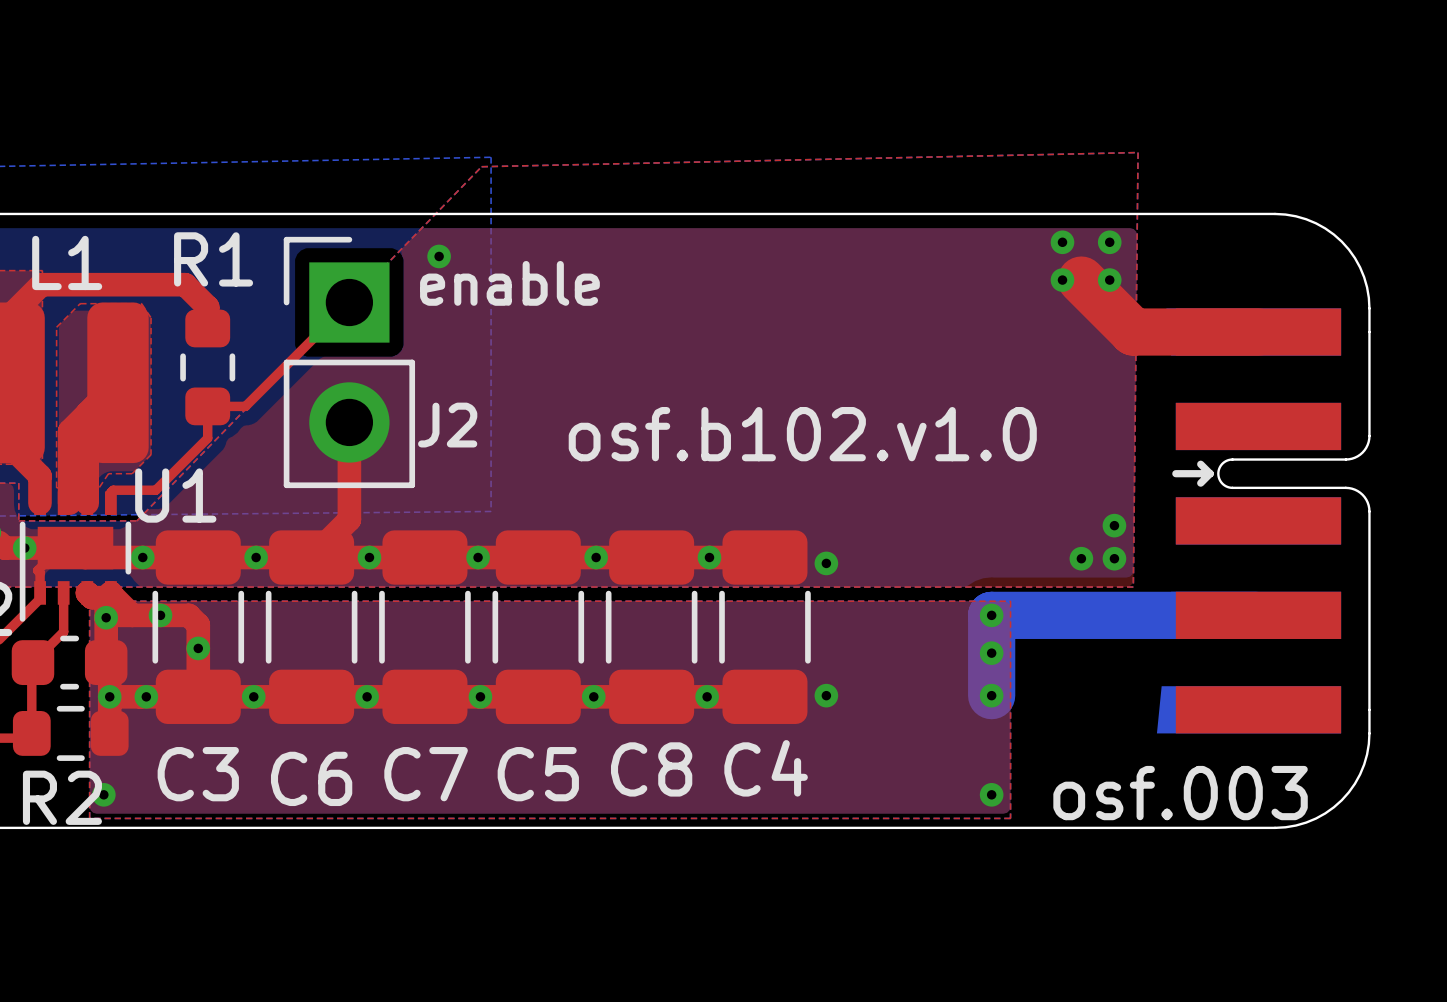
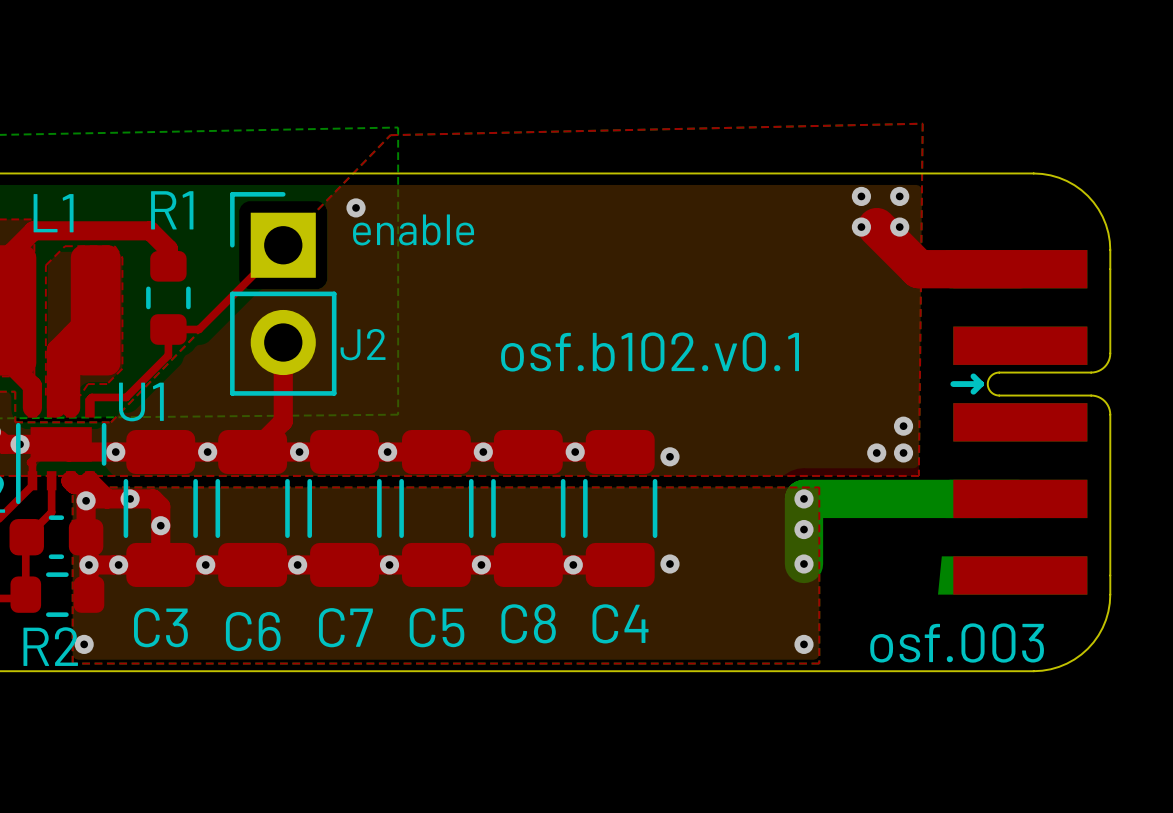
text: osf.b102.v1.0 (802, 434) -> osf.b102.v0.1 (650, 352)

